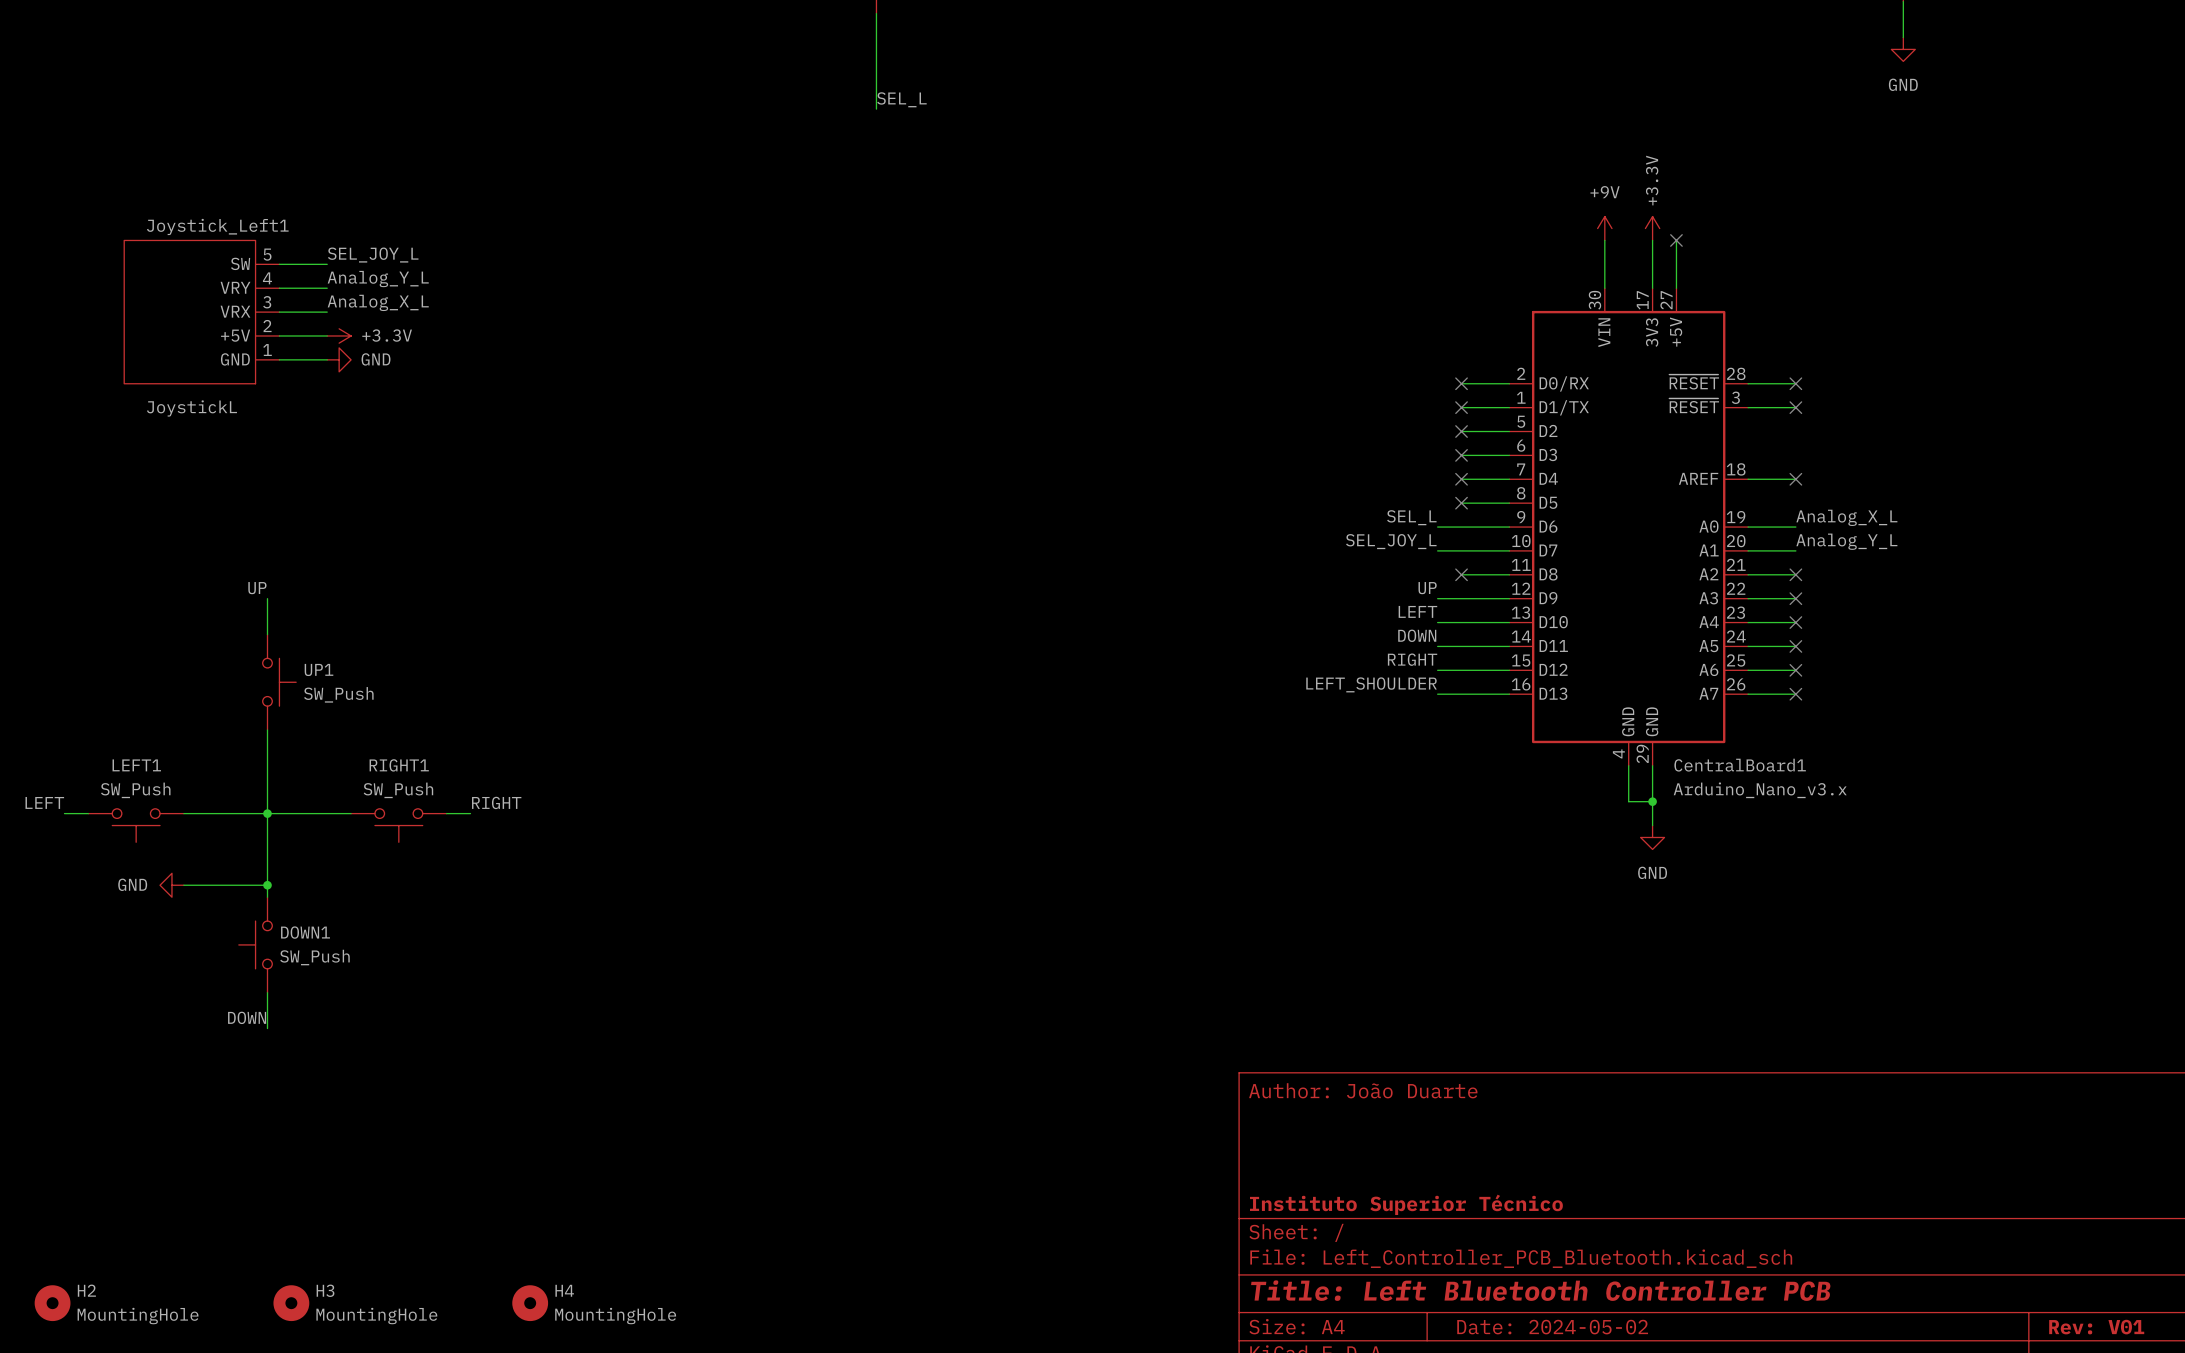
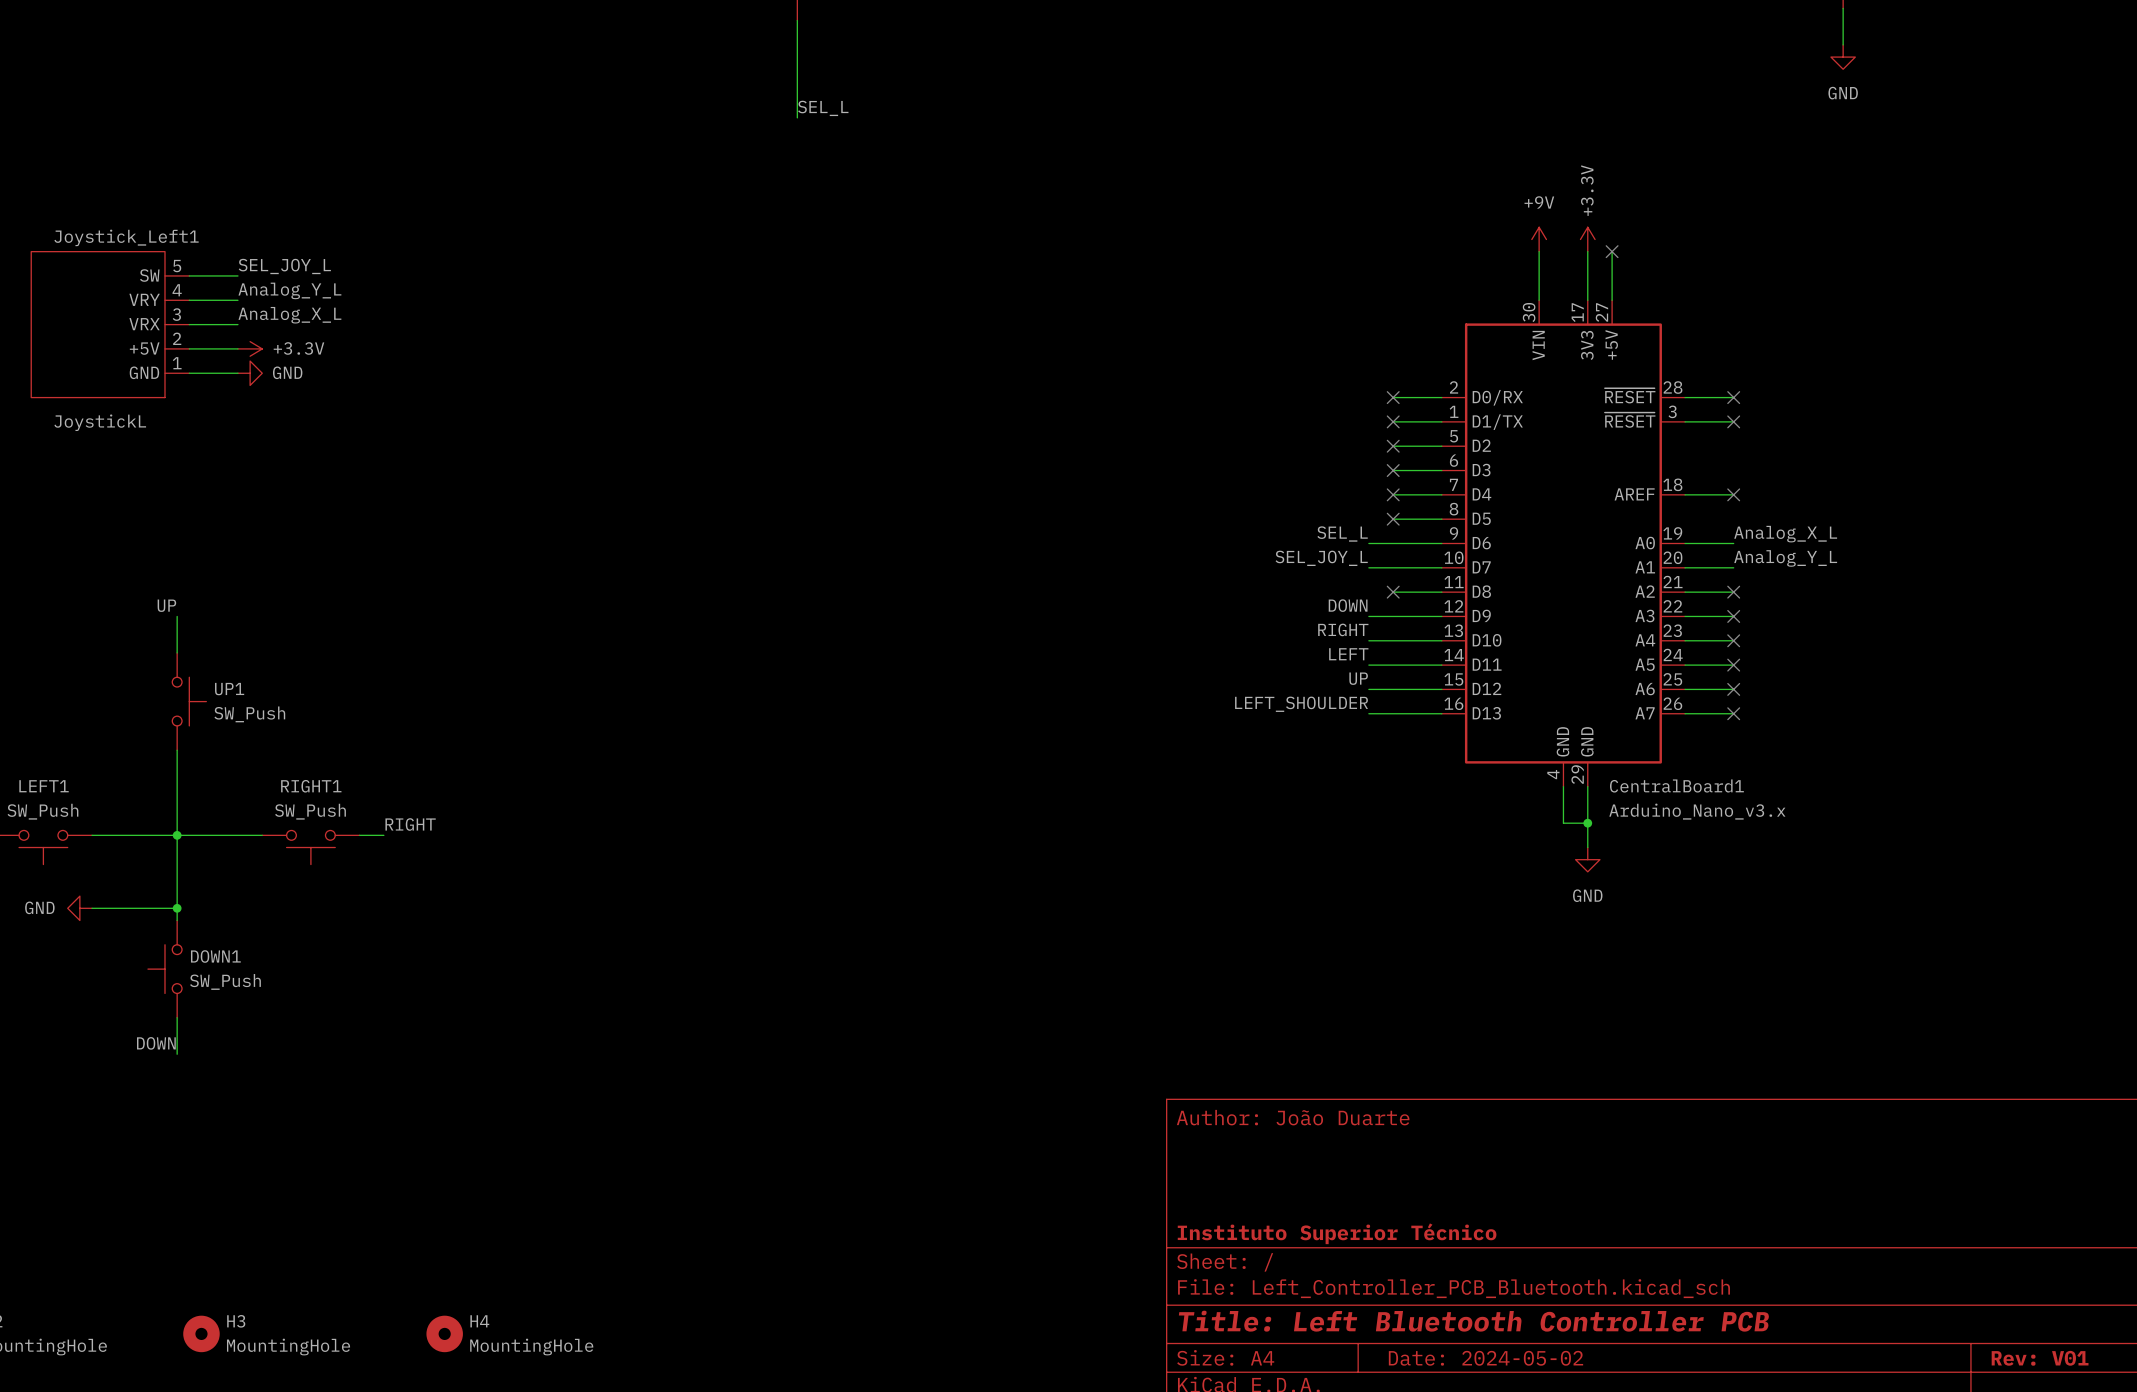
label: UP (1427, 588) -> DOWN (1348, 605)
label: LEFT (1417, 611) -> RIGHT (1343, 629)
label: DOWN (1417, 635) -> LEFT (1348, 654)
label: RIGHT (1412, 659) -> UP (1358, 678)

